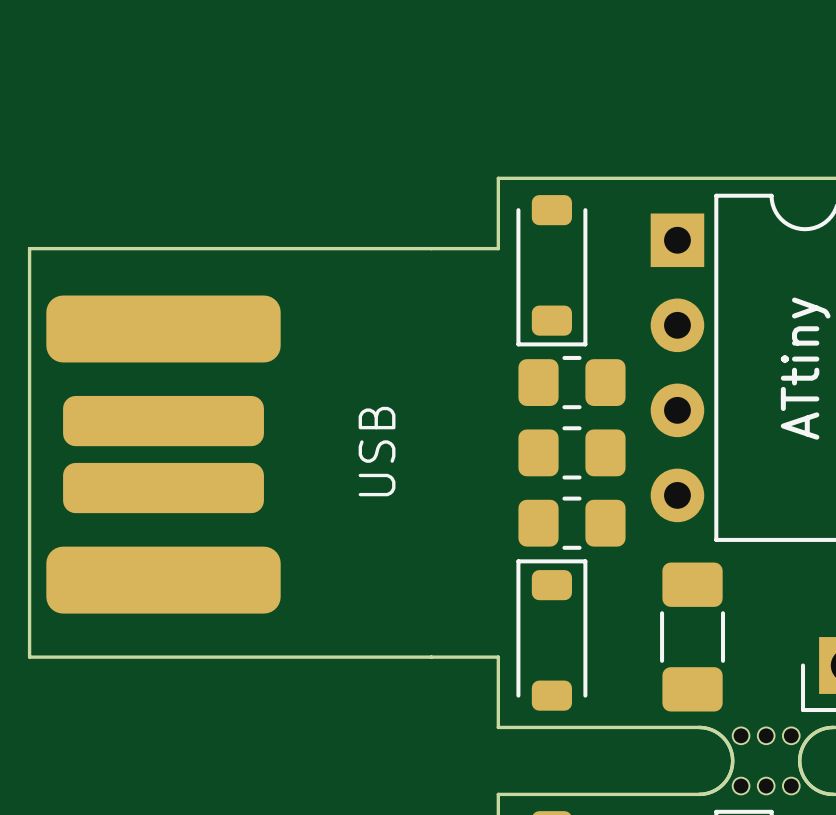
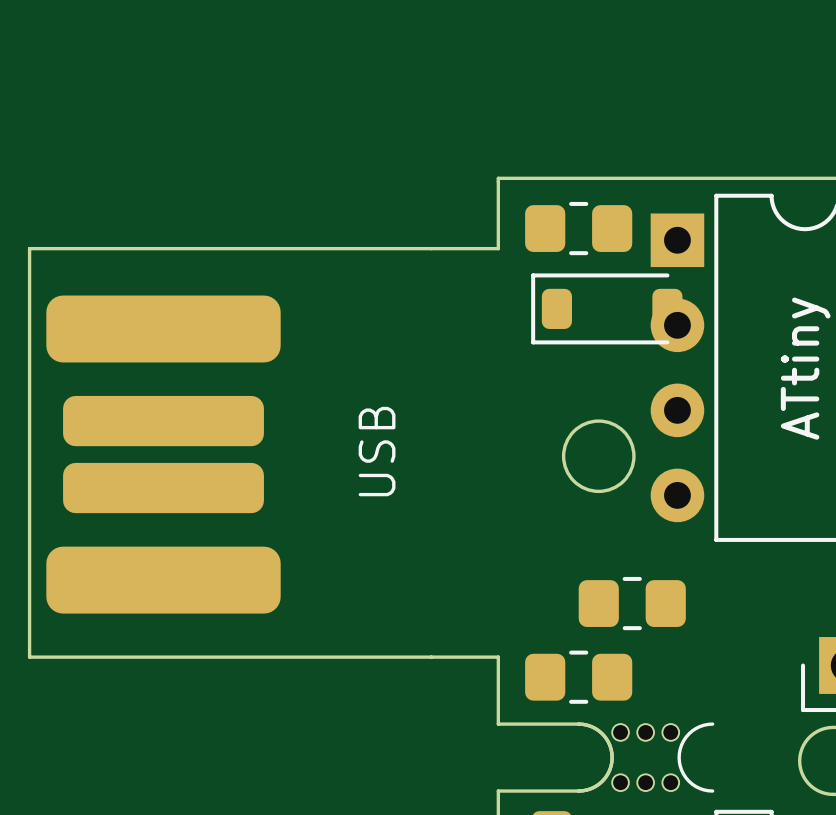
part: none -> (578, 228)
part rotation: 0° (551, 270) -> 90° clockwise (606, 308)
part: (571, 382) -> none
round board edge: none -> [561, 419, 636, 494]
part: (571, 452) -> none
part: (571, 523) -> none
part: none -> (632, 603)
part: (551, 635) -> none
part: (692, 637) -> none
part: none -> (578, 677)
board edge: (498, 724) (498, 727) (703, 727) (714, 731) (724, 738) (730, 749) (732, 760) (730, 772) (724, 783) (714, 790) (703, 794) (498, 794) -> (498, 724) (586, 725) (603, 735) (609, 745) (612, 757) (606, 776) (590, 788) (578, 791) (498, 791) (498, 794)
part position: (766, 760) -> (645, 757)

